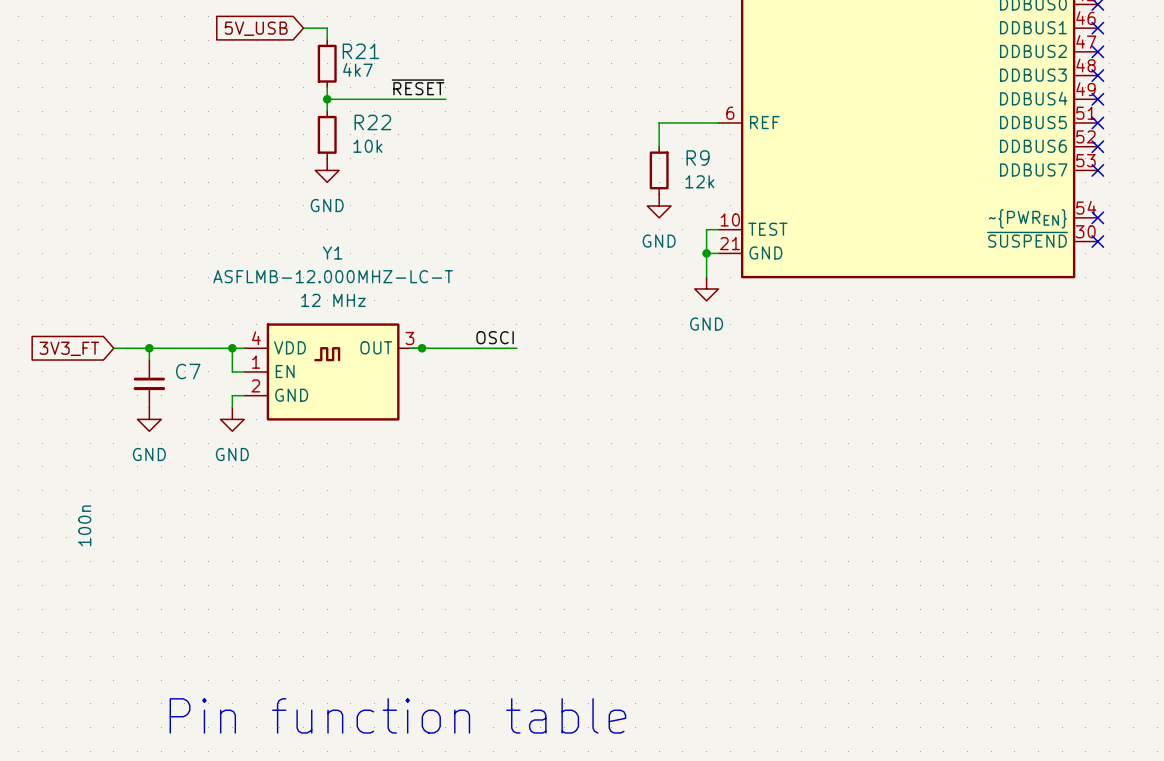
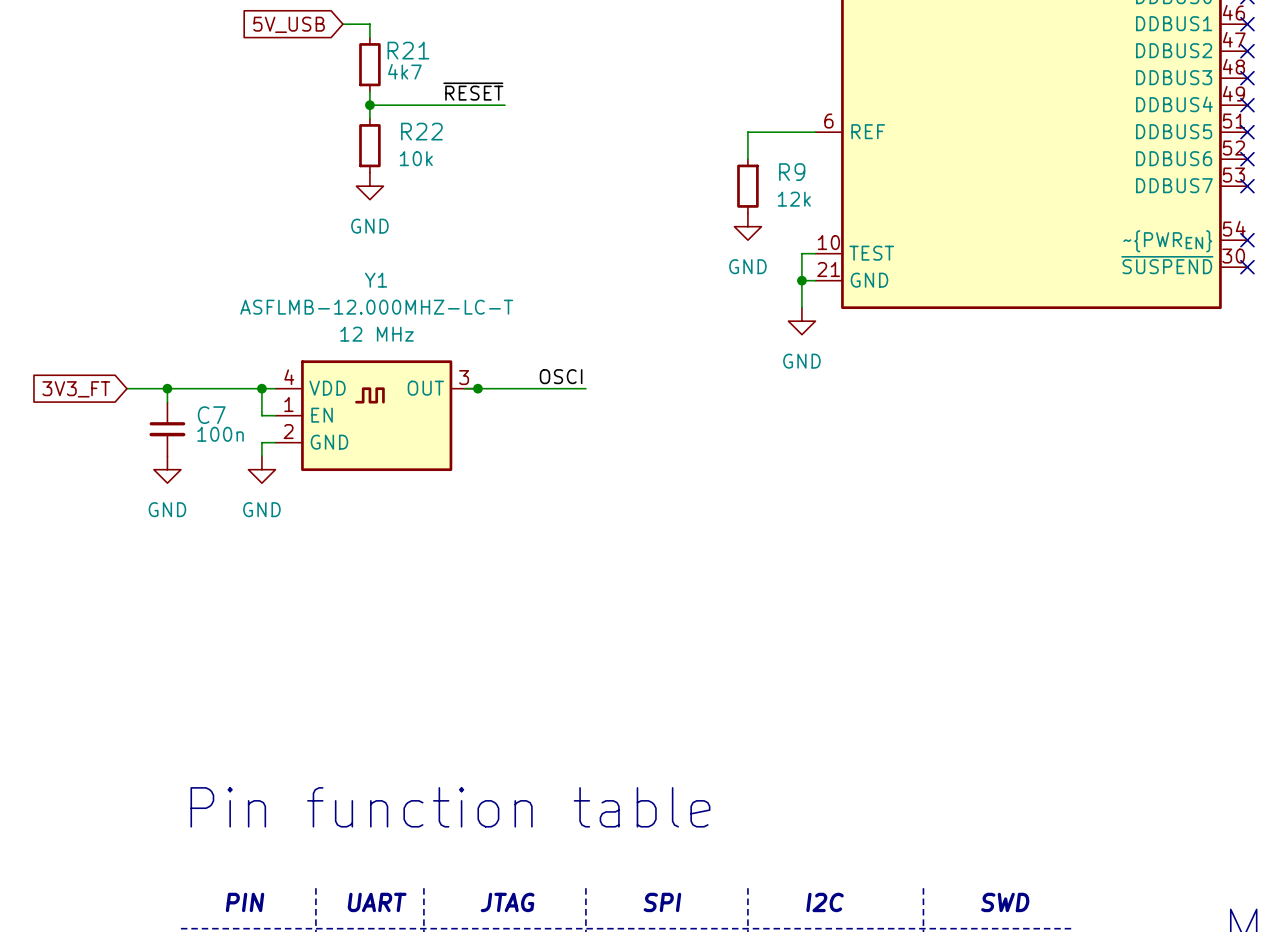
C7 text rotation: 0° (84, 525) -> 90° clockwise (220, 434)
C7 text position: 100n (84, 525) -> 100n (220, 434)

